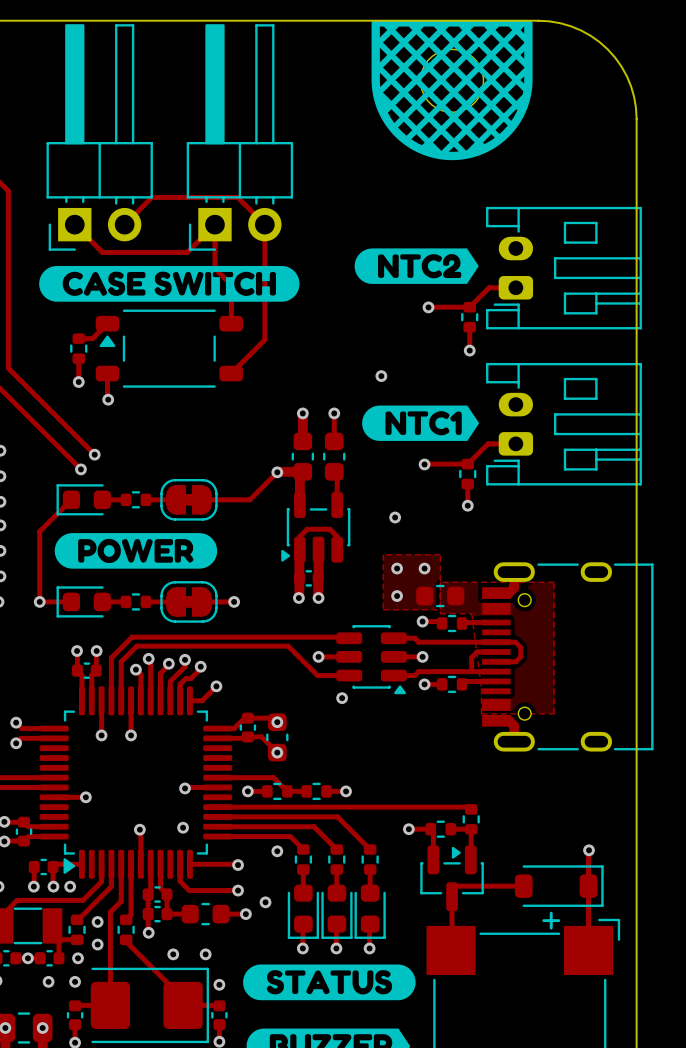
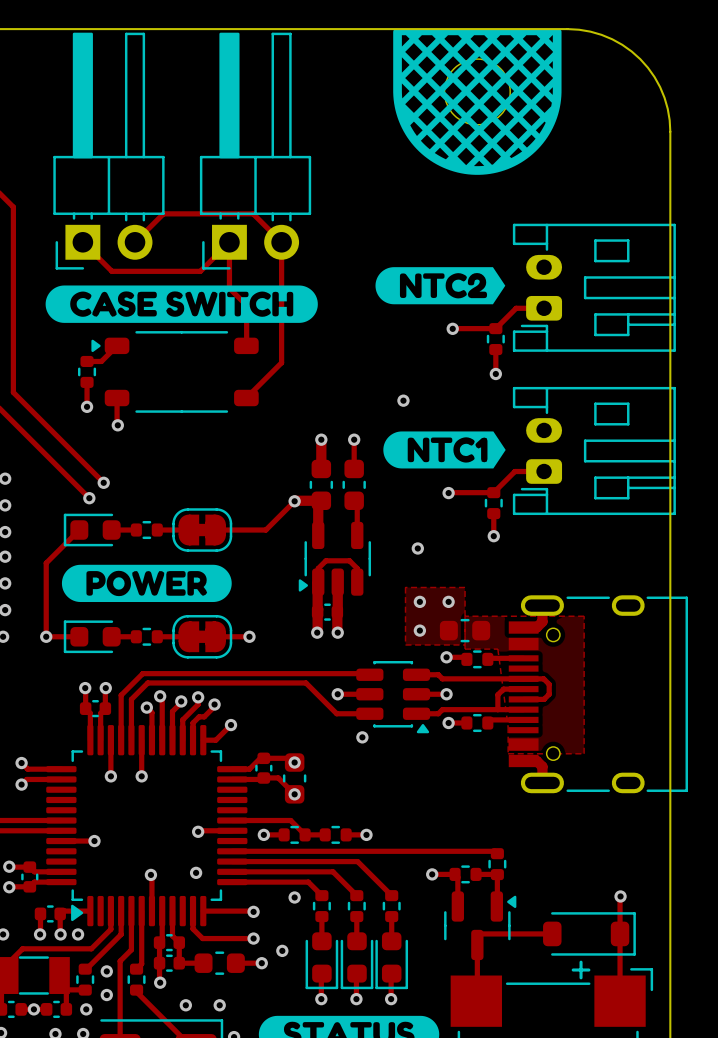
part footprint: [95, 309, 243, 388] -> [91, 331, 259, 413]
part footprint: [281, 491, 351, 563] -> [298, 521, 372, 596]
part footprint: [420, 845, 484, 912] -> [444, 891, 517, 961]

